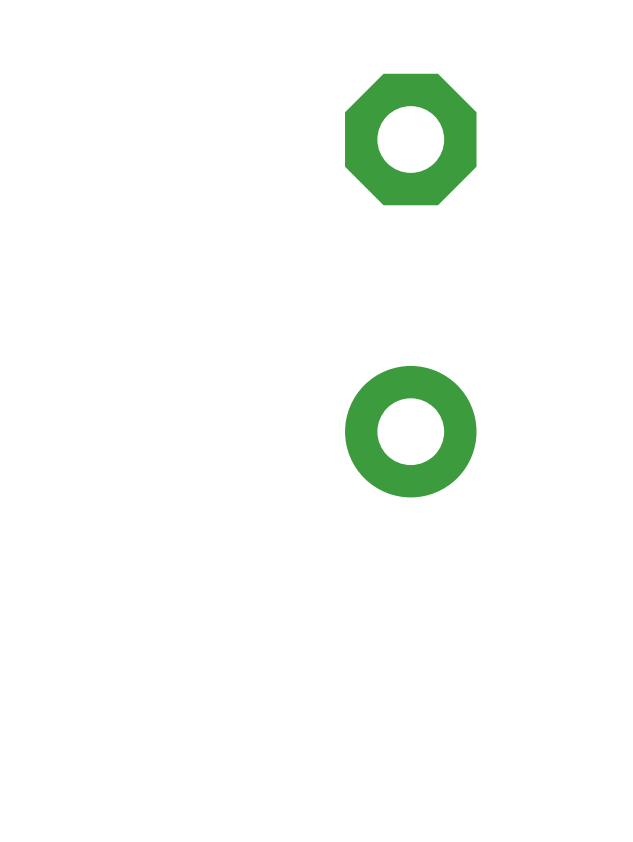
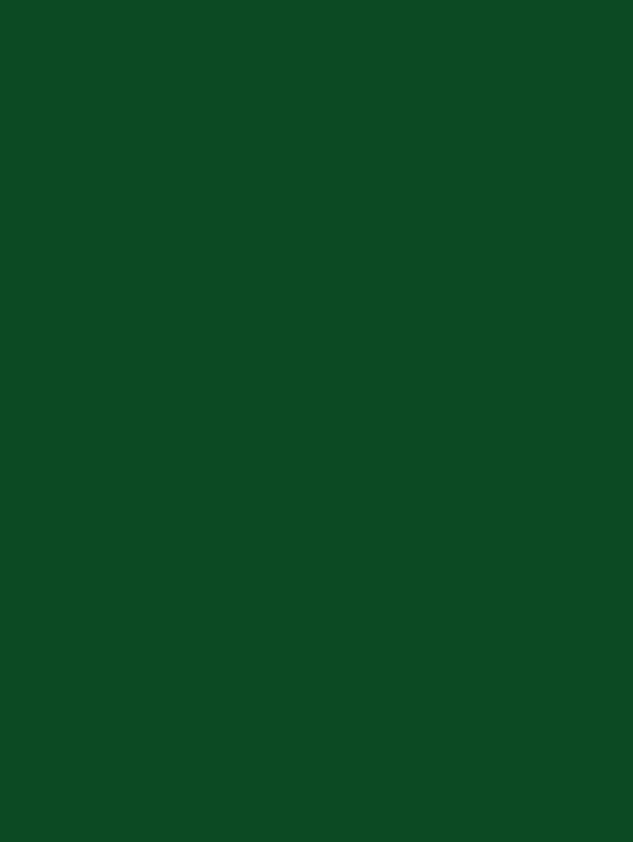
part: (410, 285) -> none

